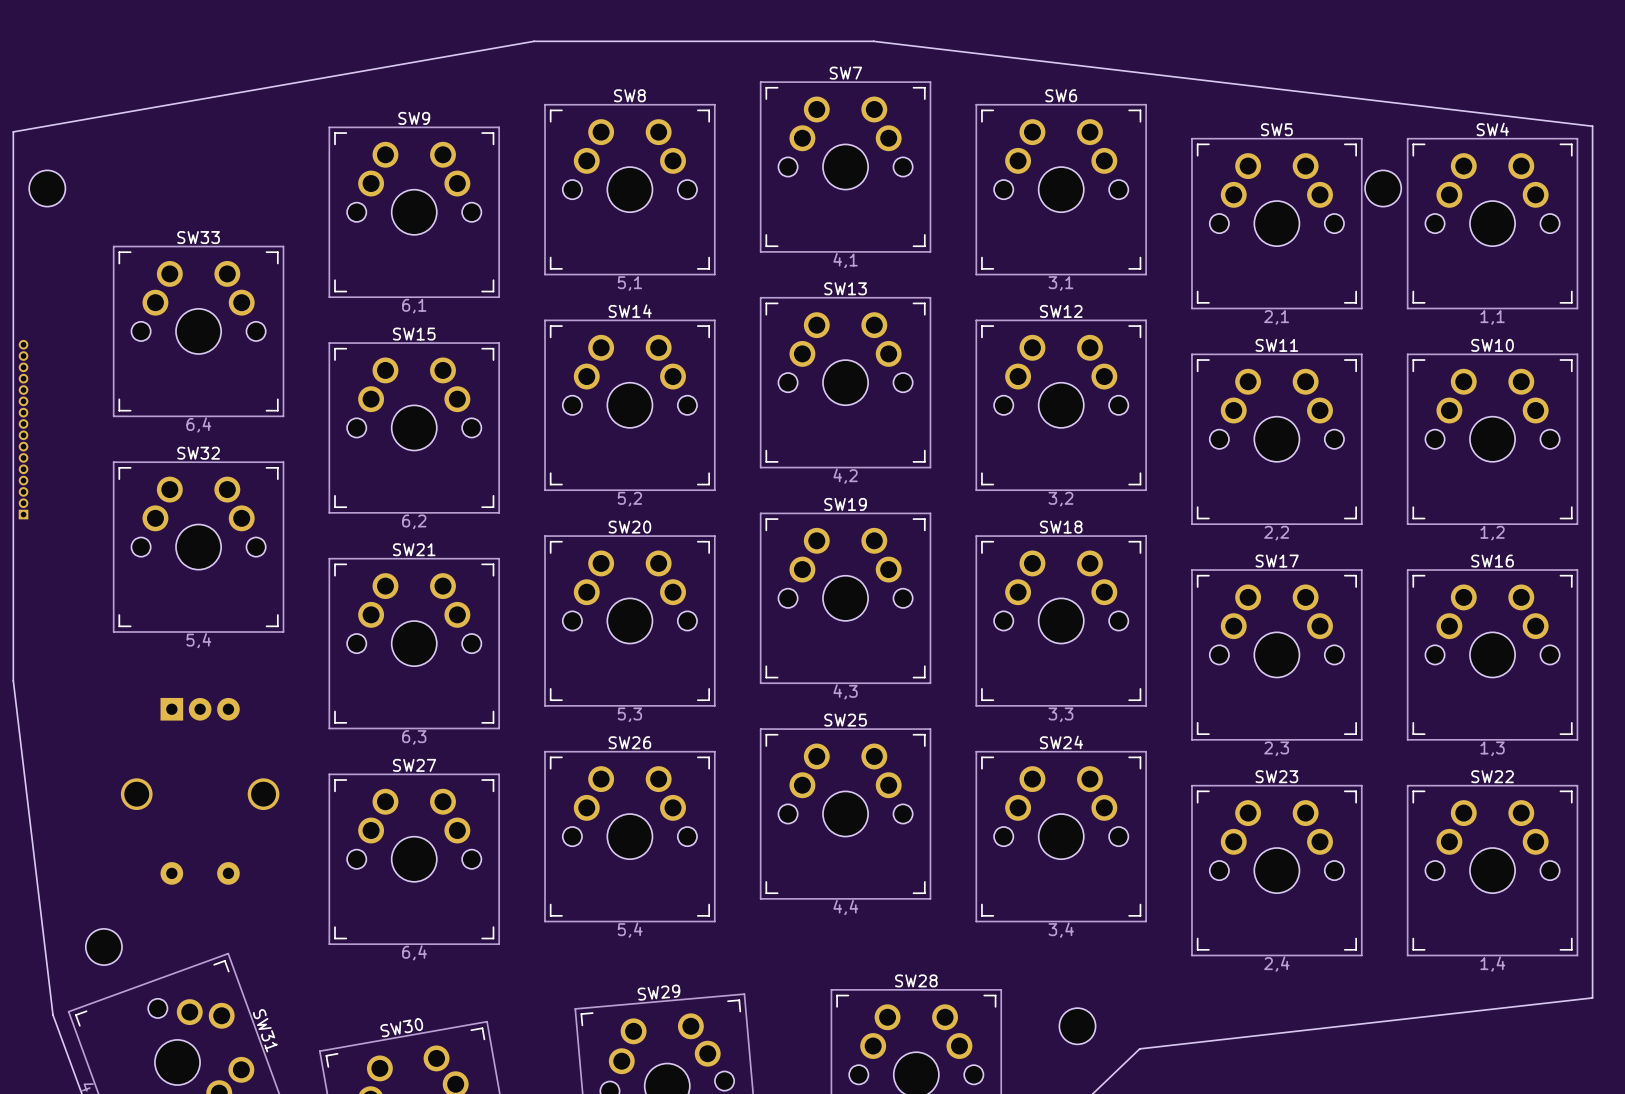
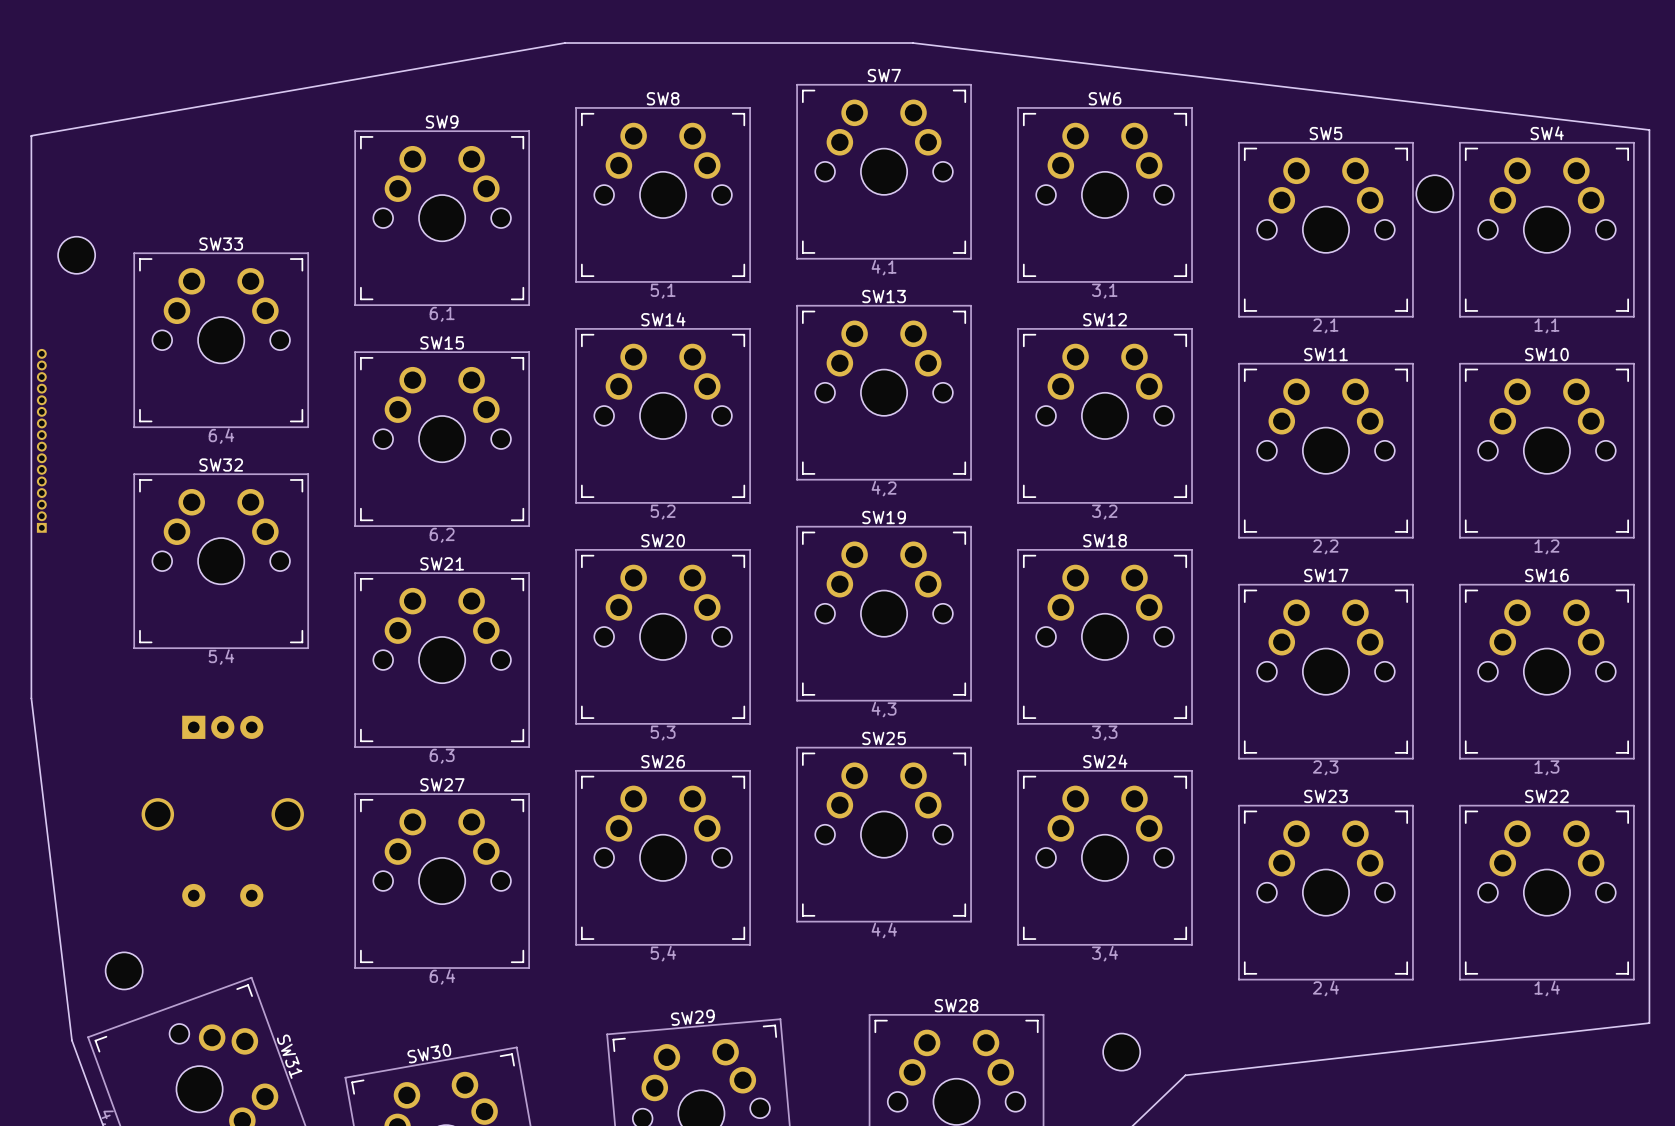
part position: (47, 188) -> (76, 255)

